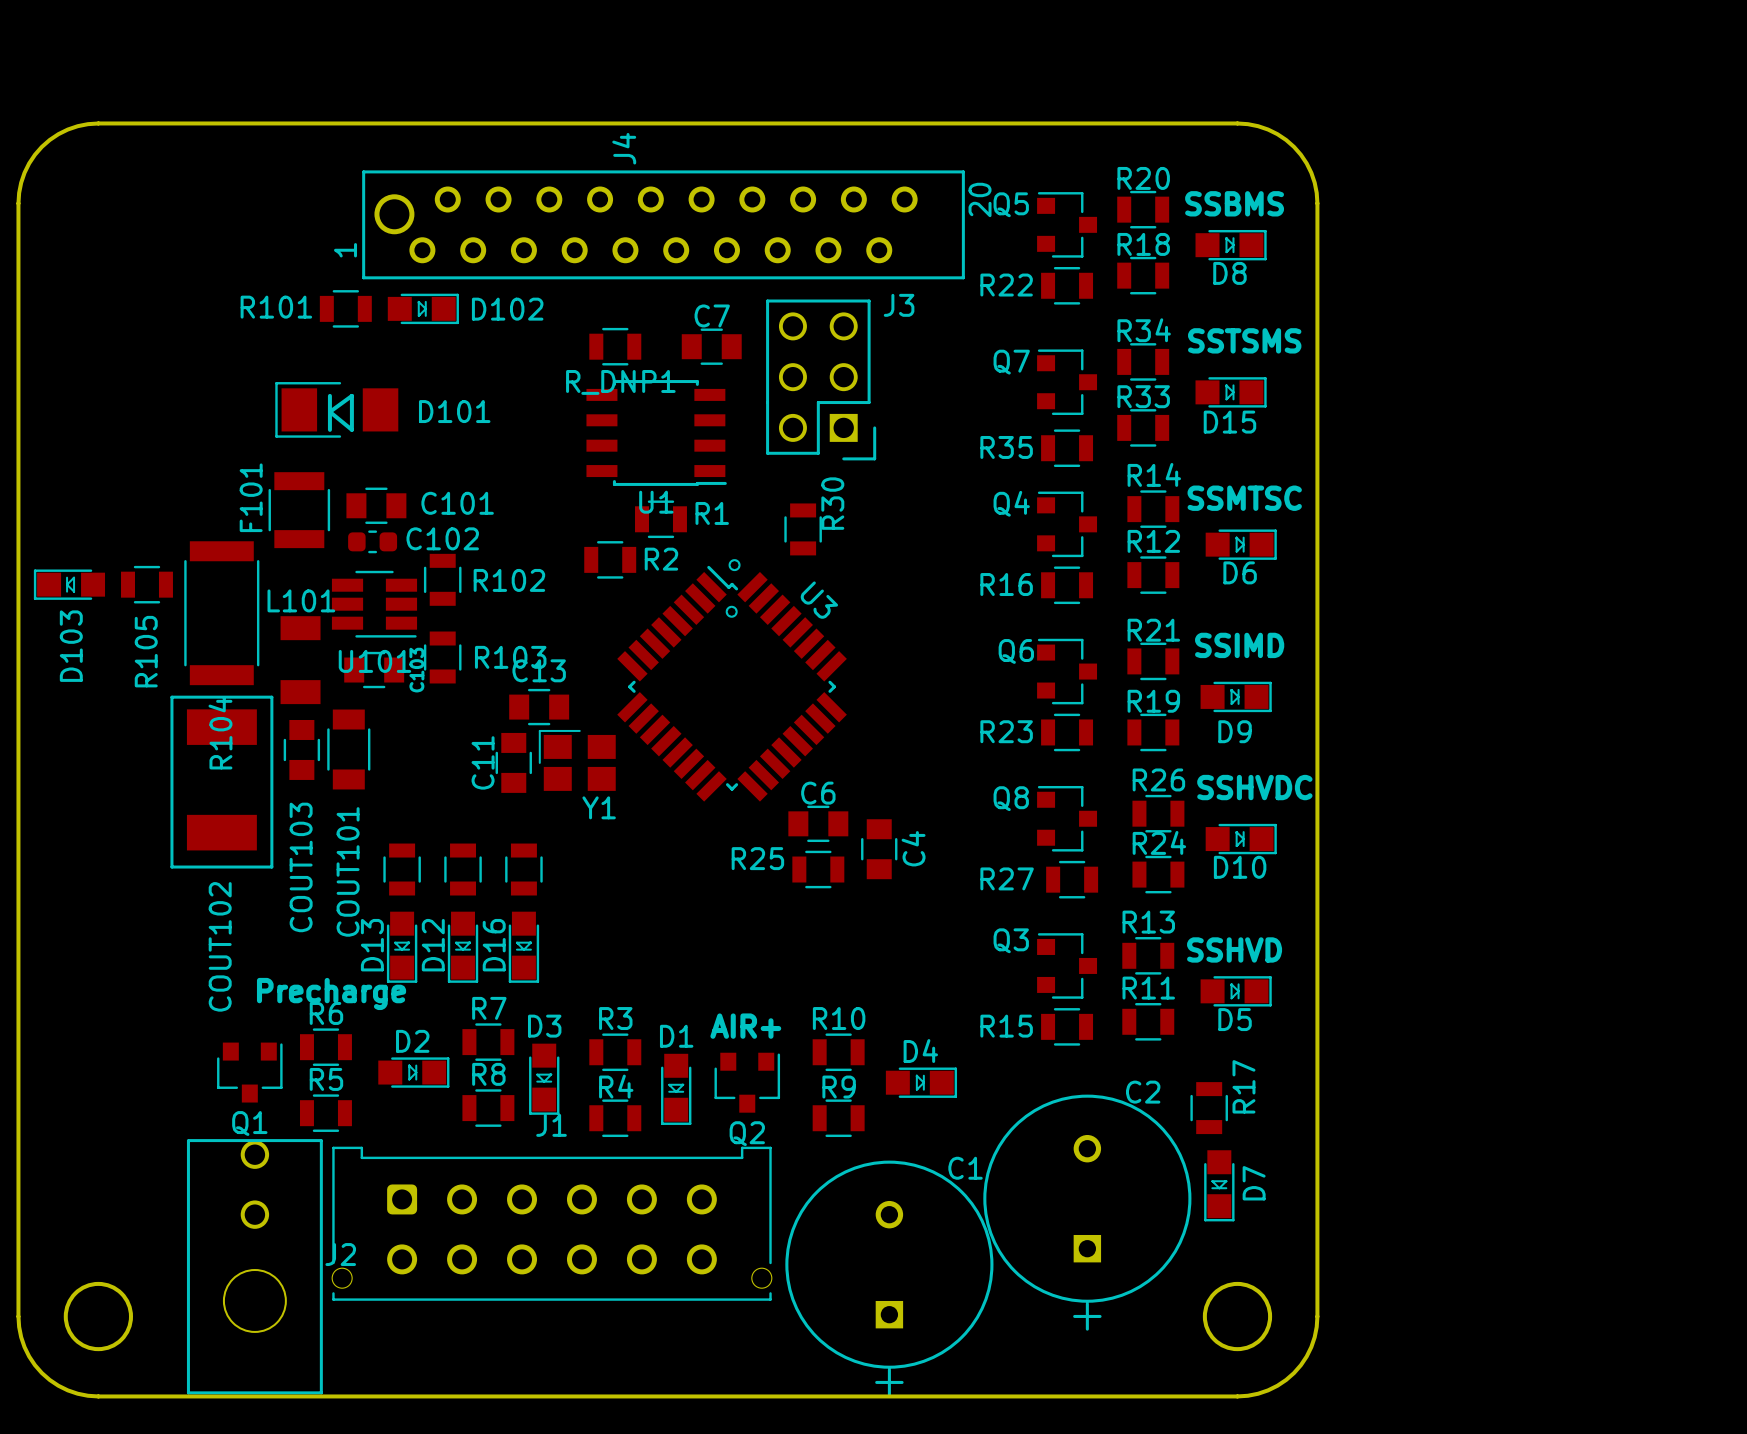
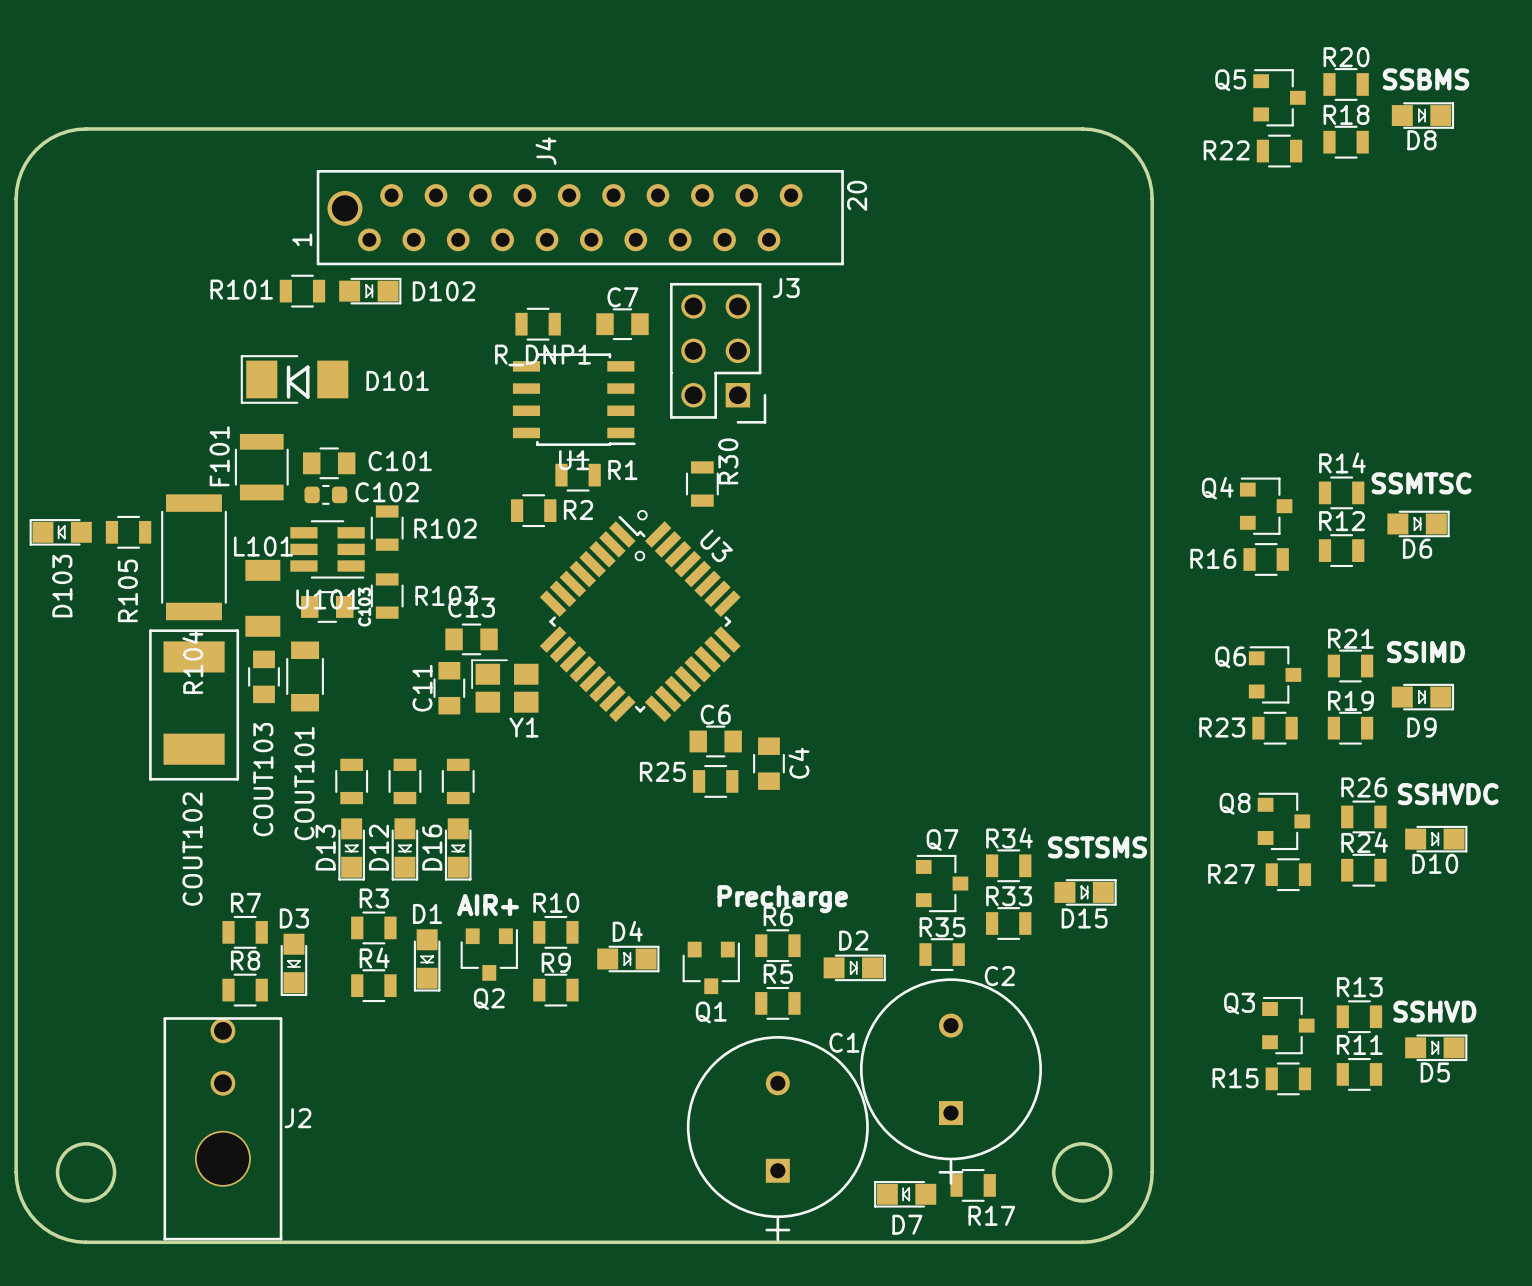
text position: SSBMS (1234, 203) -> SSBMS (1425, 79)
R20 position: (1143, 209) -> (1346, 84)
Q5 position: (1067, 224) -> (1279, 97)
D8 position: (1231, 245) -> (1422, 115)
R18 position: (1143, 275) -> (1346, 142)
R22 position: (1067, 285) -> (1279, 151)
text: SSTSMS (1244, 340) -> none
R34 position: (1143, 361) -> (1008, 865)
Q7 name position: Q7 (1011, 362) -> Q7 (942, 840)
Q7 position: (1067, 382) -> (942, 883)
D15 position: (1231, 392) -> (1085, 892)
R33 position: (1143, 427) -> (1008, 923)
R35 name position: R35 (1006, 447) -> R35 (942, 927)
R35 position: (1067, 448) -> (942, 954)
text position: SSMTSC (1244, 498) -> SSMTSC (1421, 483)
R14 position: (1153, 509) -> (1341, 492)
Q4 position: (1067, 524) -> (1266, 506)
D6 position: (1241, 544) -> (1418, 523)
R12 position: (1153, 575) -> (1341, 550)
R16 position: (1067, 585) -> (1266, 559)
text position: SSIMD (1239, 645) -> SSIMD (1425, 652)
R21 position: (1153, 661) -> (1350, 666)
Q6 position: (1067, 671) -> (1275, 674)
D9 position: (1236, 696) -> (1422, 697)
R23 position: (1067, 732) -> (1275, 728)
R19 position: (1153, 732) -> (1350, 728)
text position: SSHVDC (1254, 787) -> SSHVDC (1448, 794)
R26 position: (1158, 813) -> (1363, 816)
Q8 position: (1067, 818) -> (1283, 821)
D10 position: (1241, 839) -> (1436, 839)
R24 position: (1158, 874) -> (1363, 870)
R27 position: (1072, 879) -> (1288, 874)
text: none -> SSTSMS (1097, 847)
text position: SSHVD (1234, 949) -> SSHVD (1434, 1011)
R13 position: (1148, 955) -> (1359, 1016)
Q3 position: (1067, 965) -> (1288, 1025)
D5 position: (1236, 991) -> (1436, 1047)
text: Precharge (331, 993) -> none
text: none -> Precharge (782, 899)
R11 position: (1148, 1021) -> (1359, 1074)
text position: AIR+ (745, 1026) -> AIR+ (488, 905)
R15 position: (1067, 1026) -> (1288, 1078)
R7 position: (488, 1042) -> (245, 932)
R6 position: (325, 1047) -> (777, 945)
R3 position: (615, 1052) -> (373, 927)
R10 position: (838, 1052) -> (555, 932)
Q1 position: (249, 1072) -> (711, 967)
D2 position: (413, 1072) -> (854, 967)
D3 position: (544, 1079) -> (293, 964)
Q2 position: (747, 1082) -> (489, 954)
D4 position: (921, 1082) -> (628, 959)
D1 position: (676, 1089) -> (427, 960)
R8 position: (488, 1108) -> (245, 990)
R17 rotation: 0° (1209, 1108) -> 90° clockwise (973, 1185)
R17 position: (1209, 1108) -> (973, 1185)
R5 position: (325, 1113) -> (777, 1003)
R4 position: (615, 1118) -> (373, 985)
R9 position: (838, 1118) -> (555, 990)
D7 rotation: 0° (1219, 1185) -> 90° clockwise (905, 1194)
D7 position: (1219, 1185) -> (905, 1194)
J1: (551, 1223) -> none

